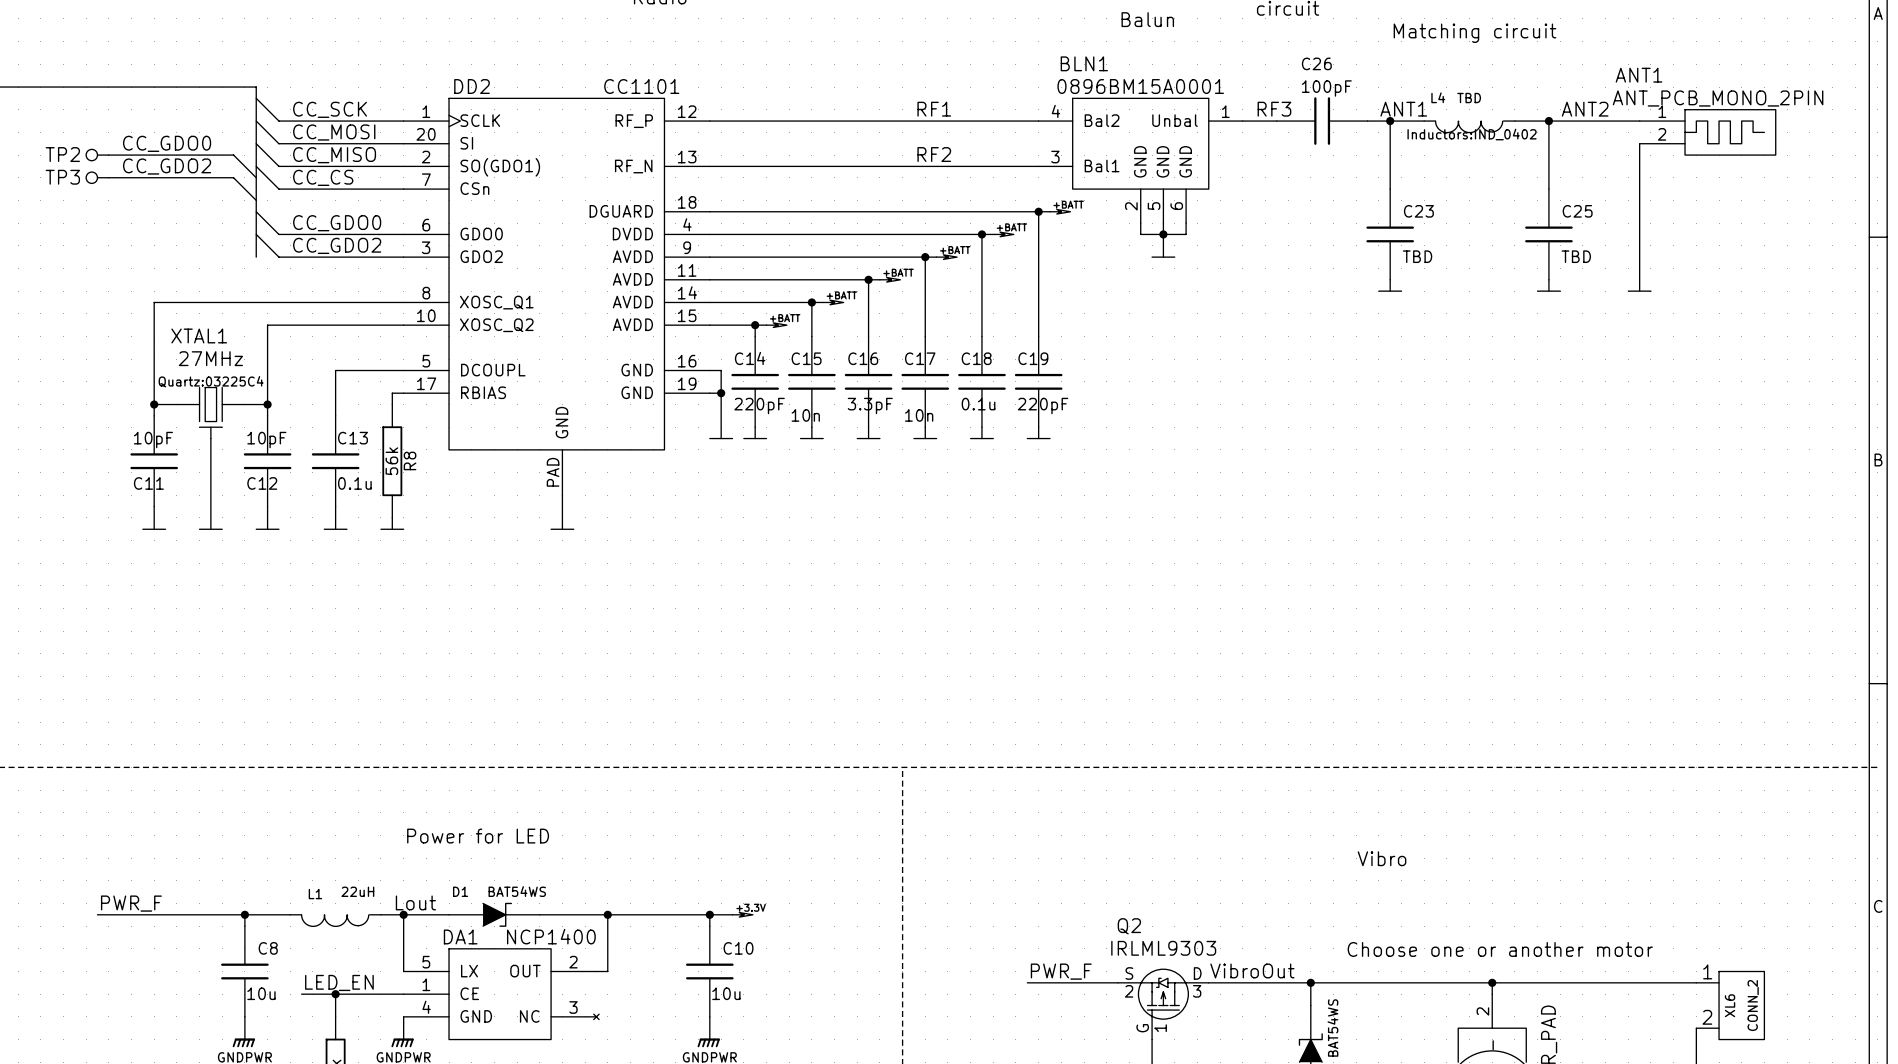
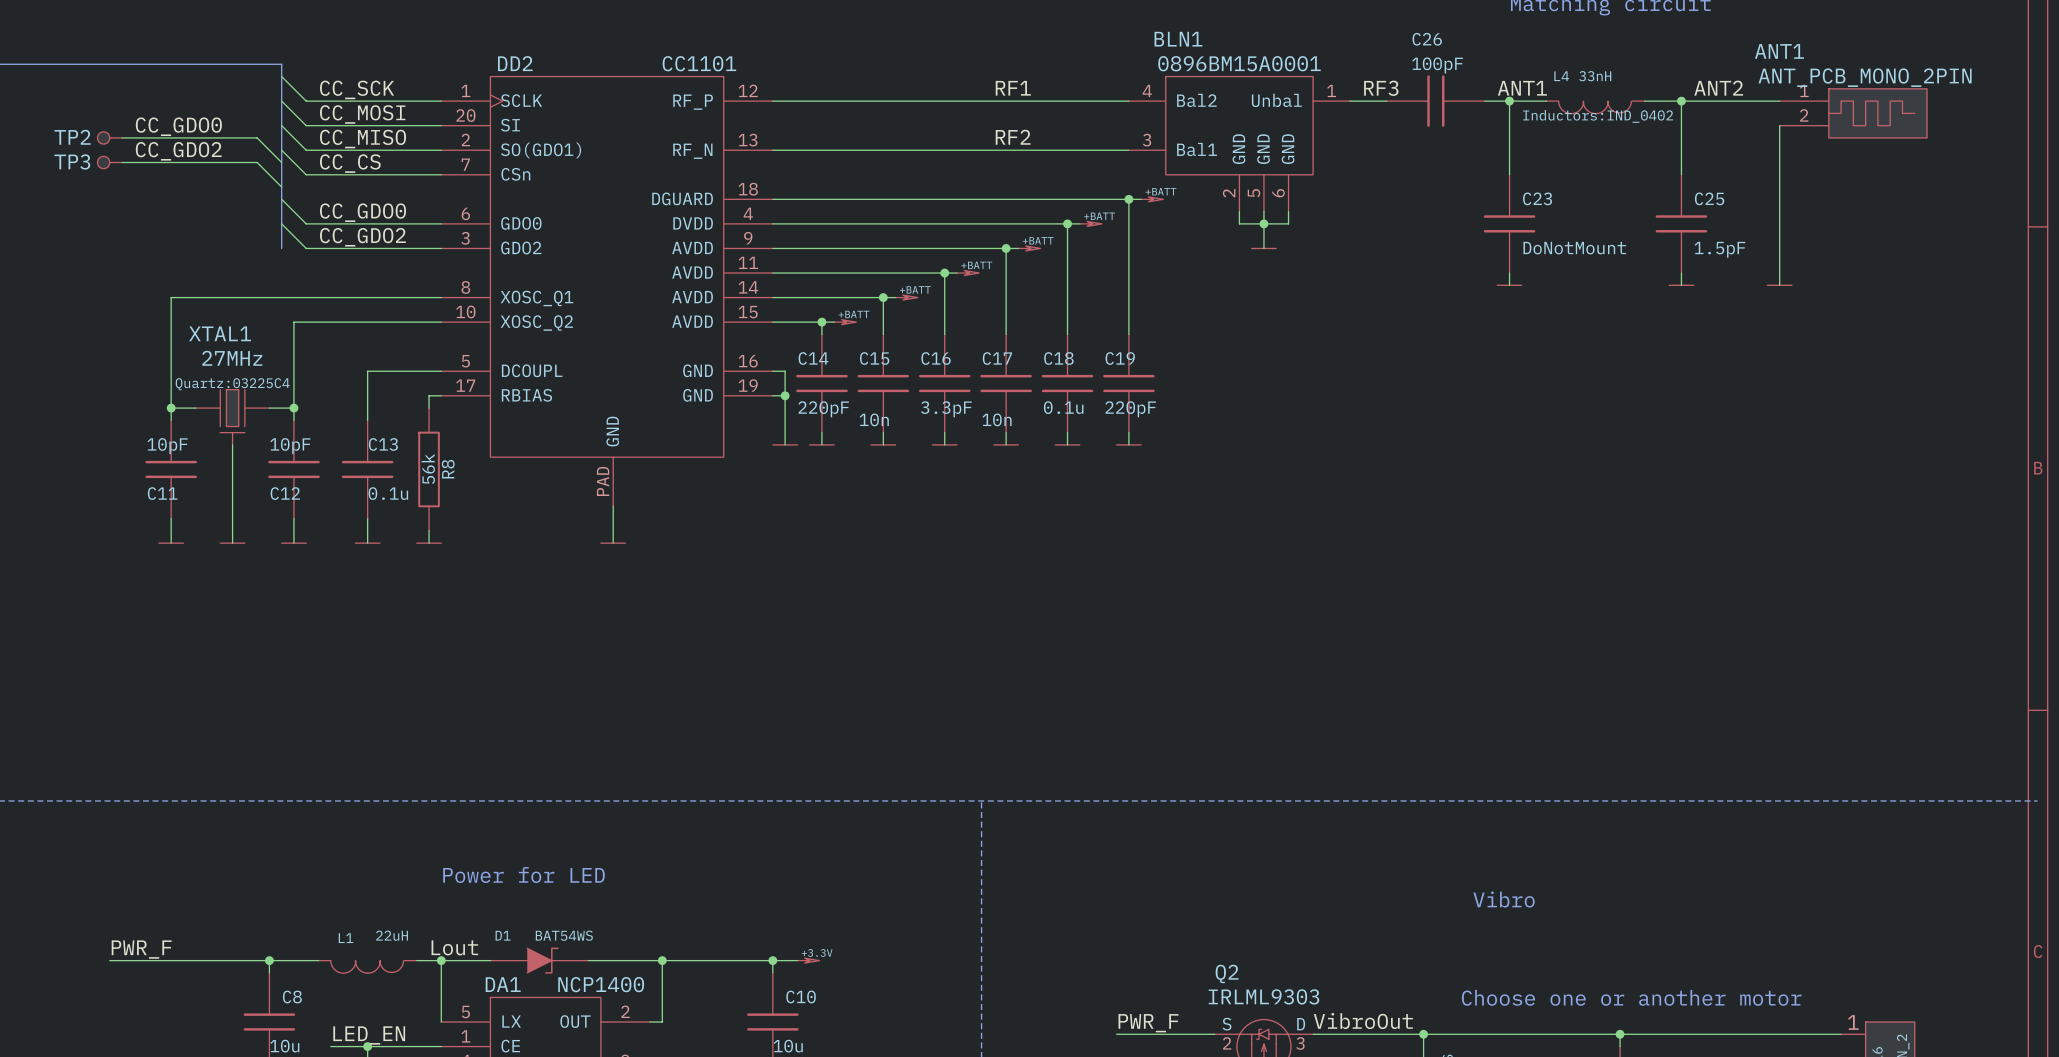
L4 value: TBD (1469, 98) -> 33nH (1595, 76)
C23 value: TBD (1417, 256) -> DoNotMount (1574, 248)
C25 value: TBD (1576, 256) -> 1.5pF (1719, 249)

